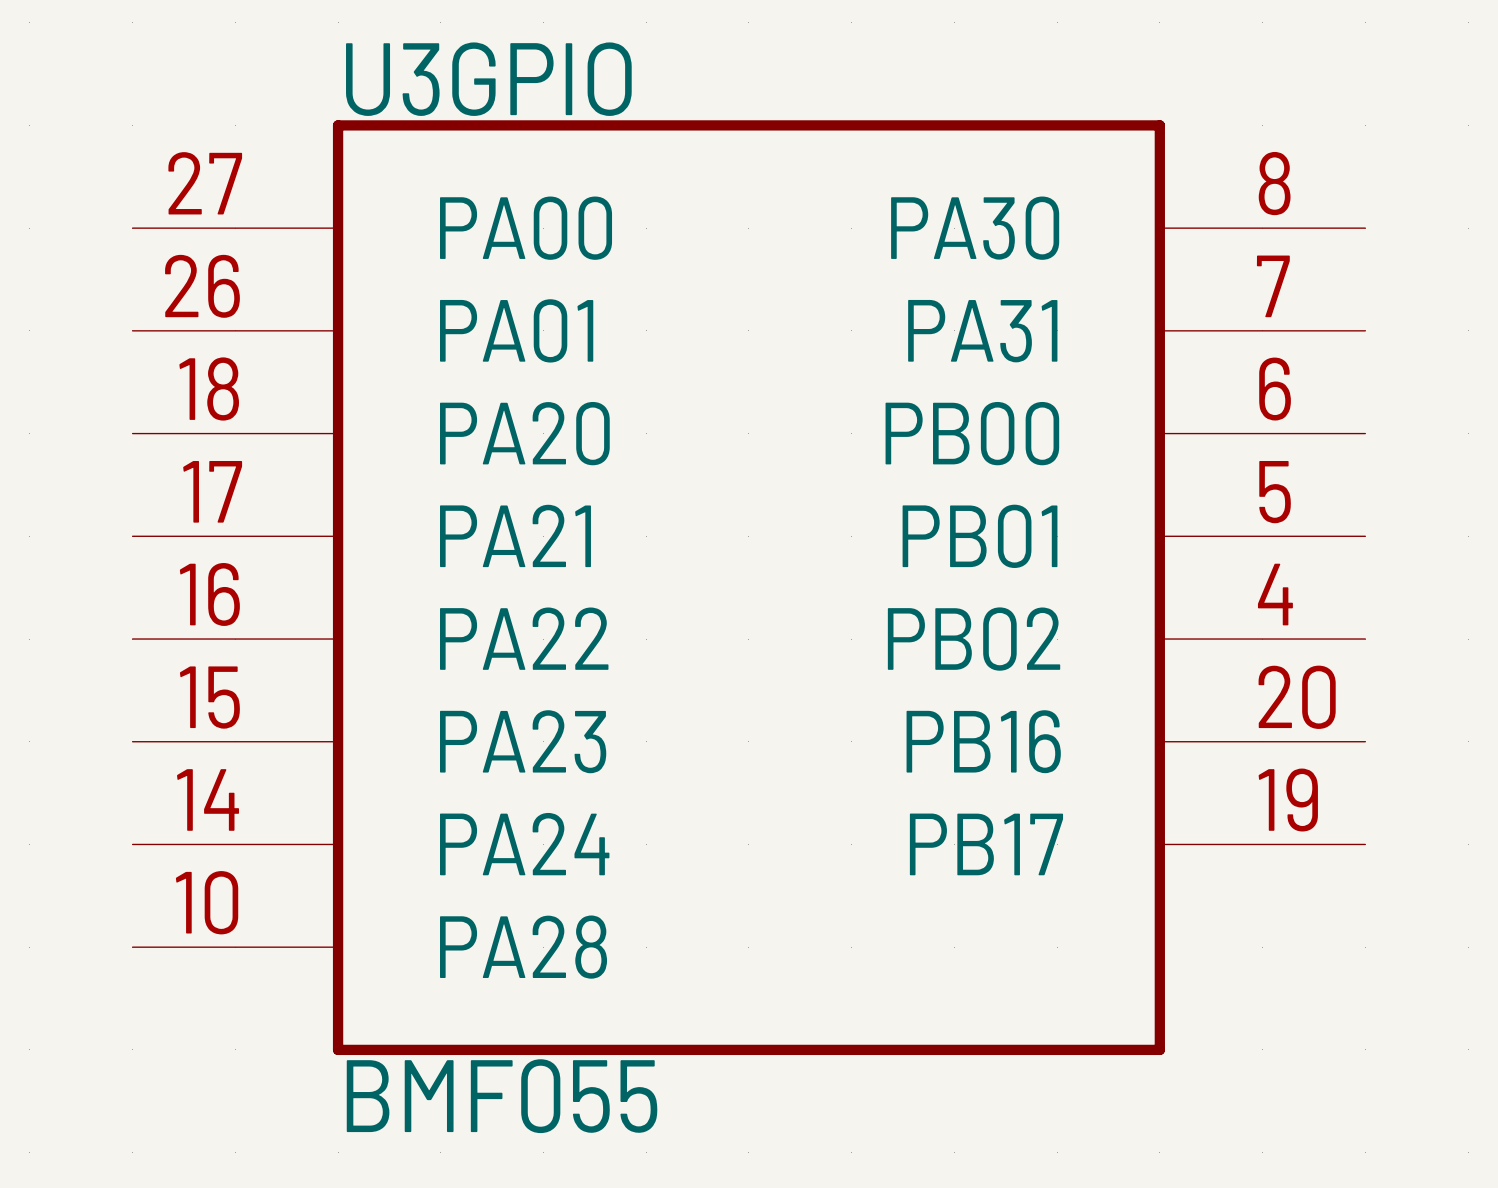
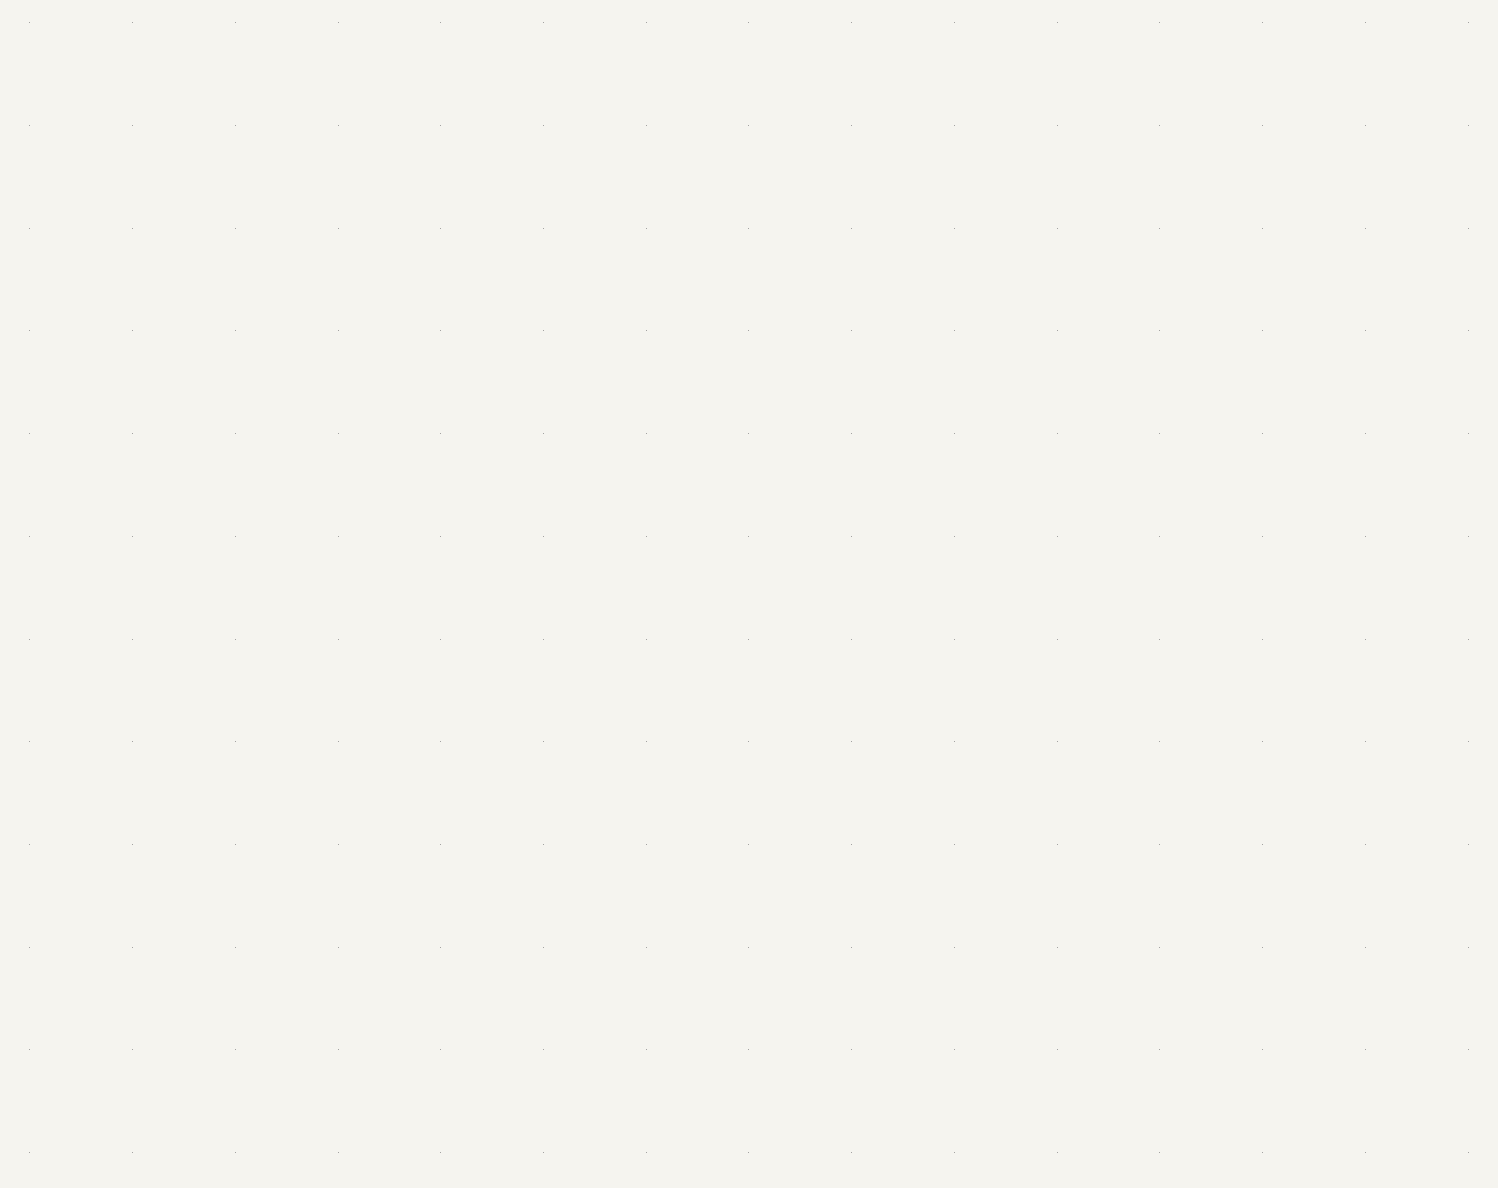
U3GPIO: BMF055 (748, 587) -> none

